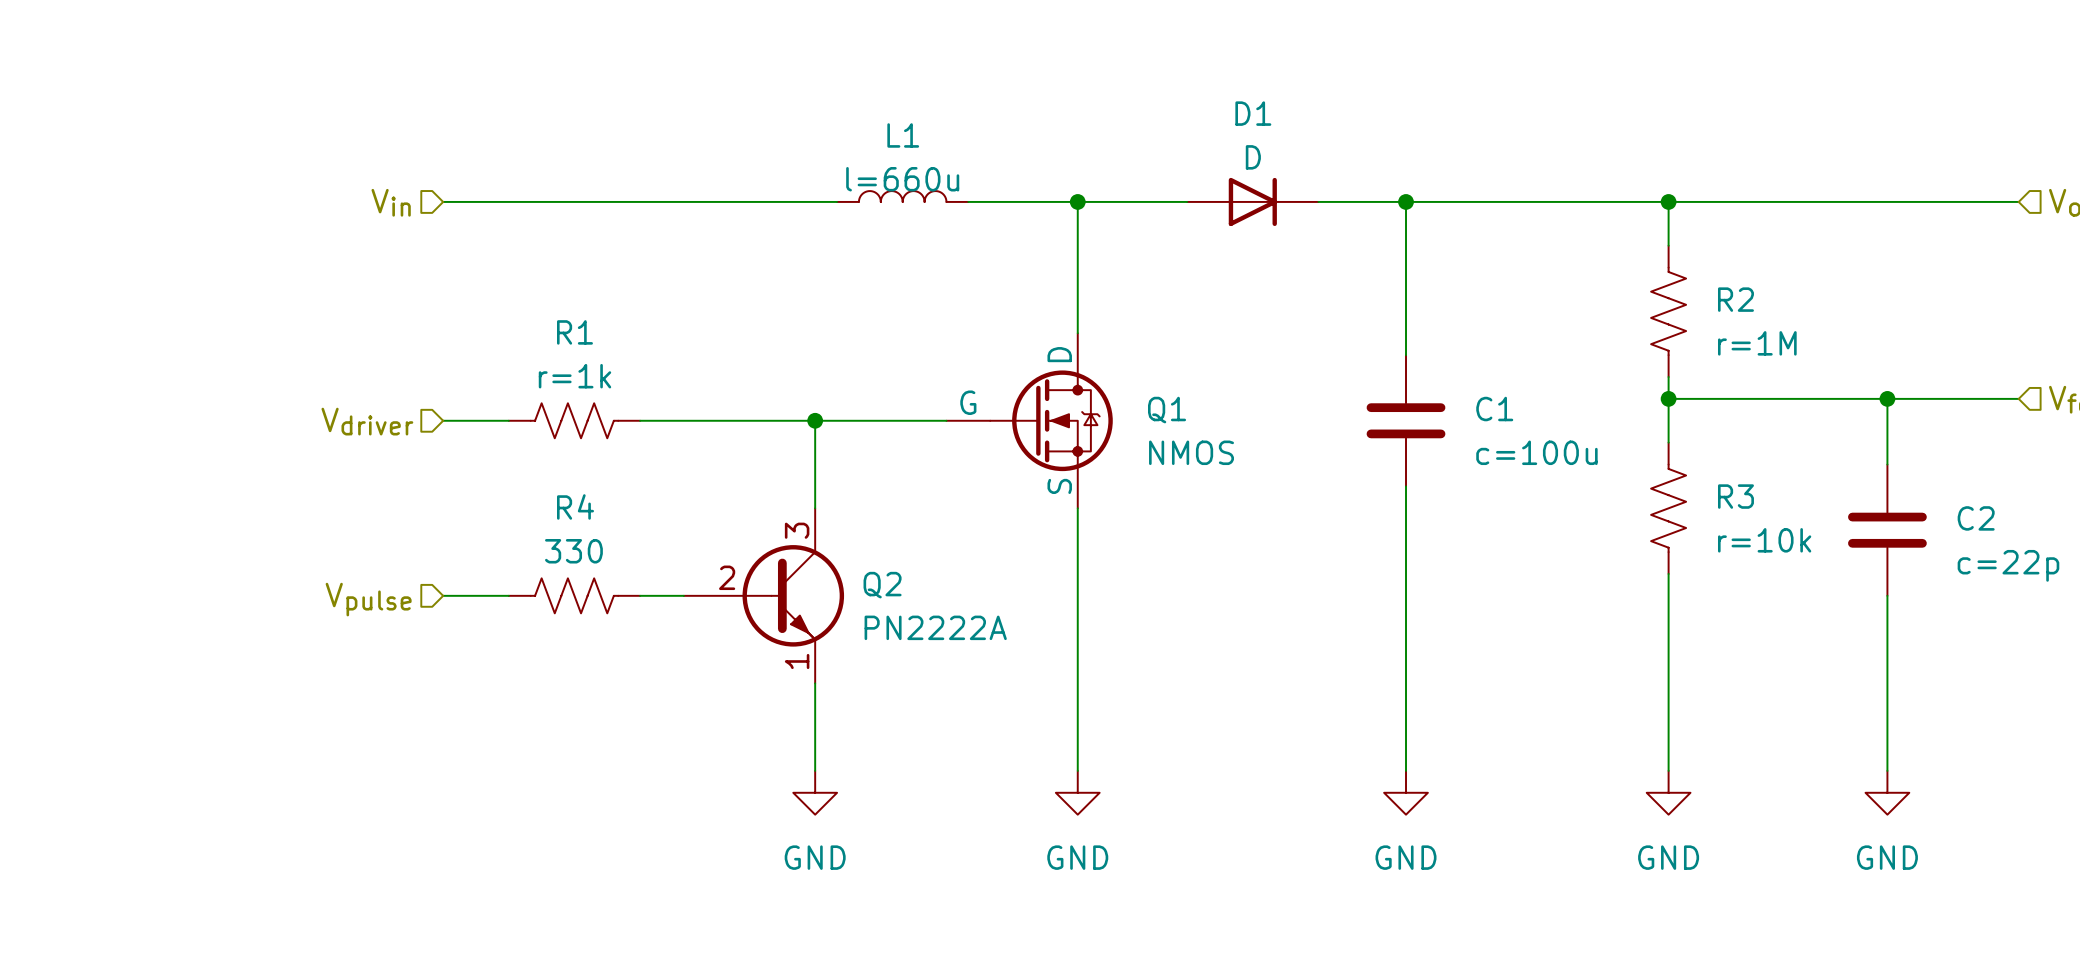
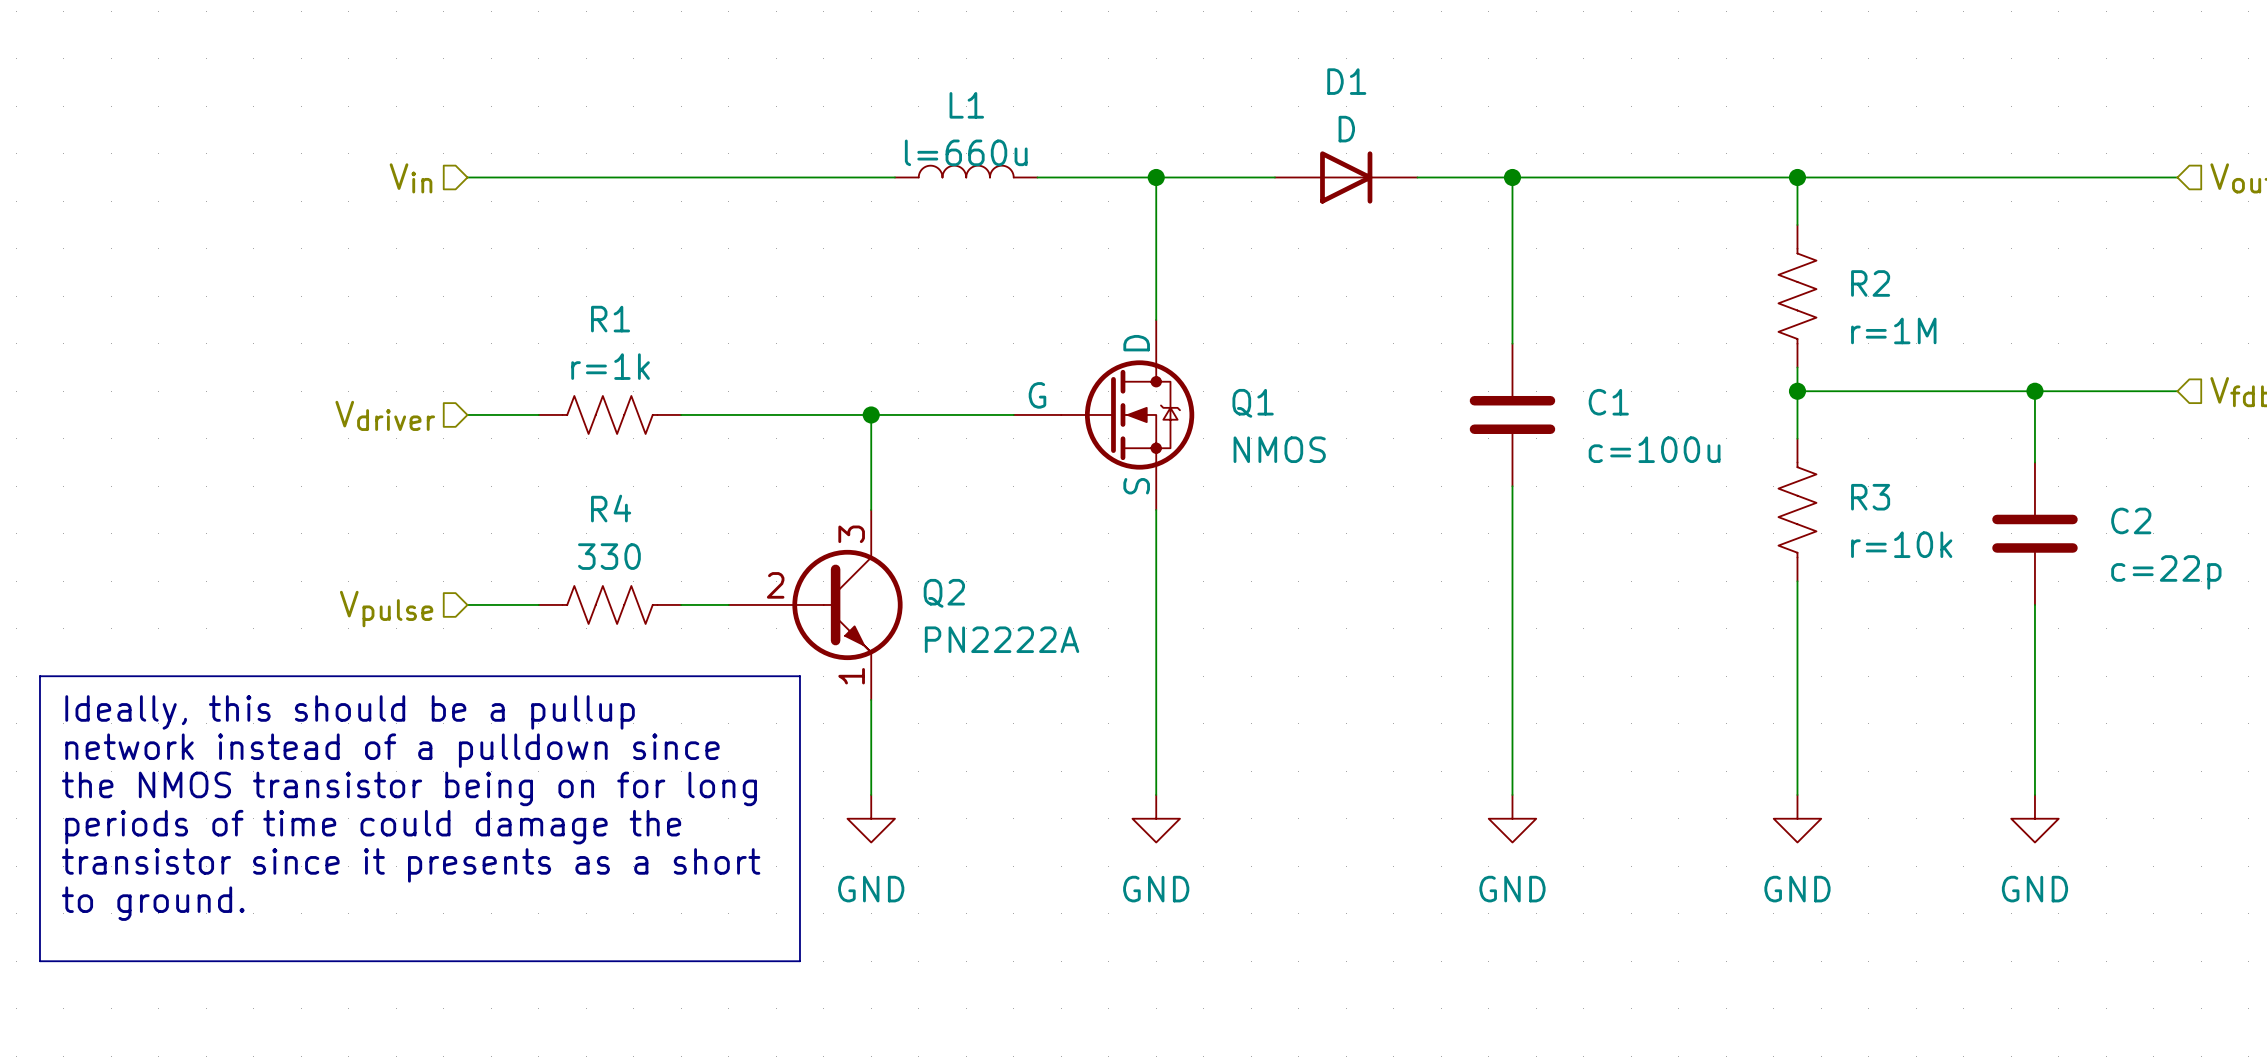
line: none -> (39, 676) (799, 676) (799, 961) (39, 961) (39, 676)
text: none -> Ideally, this should be a pullup (350, 712)
text: none -> network instead of a pulldown since (392, 750)
text: none -> the NMOS transistor being on for long (409, 788)
text: none -> periods of time could damage the (373, 827)
text: none -> transistor since it presents as a short (411, 865)
text: none -> to ground. (153, 903)

